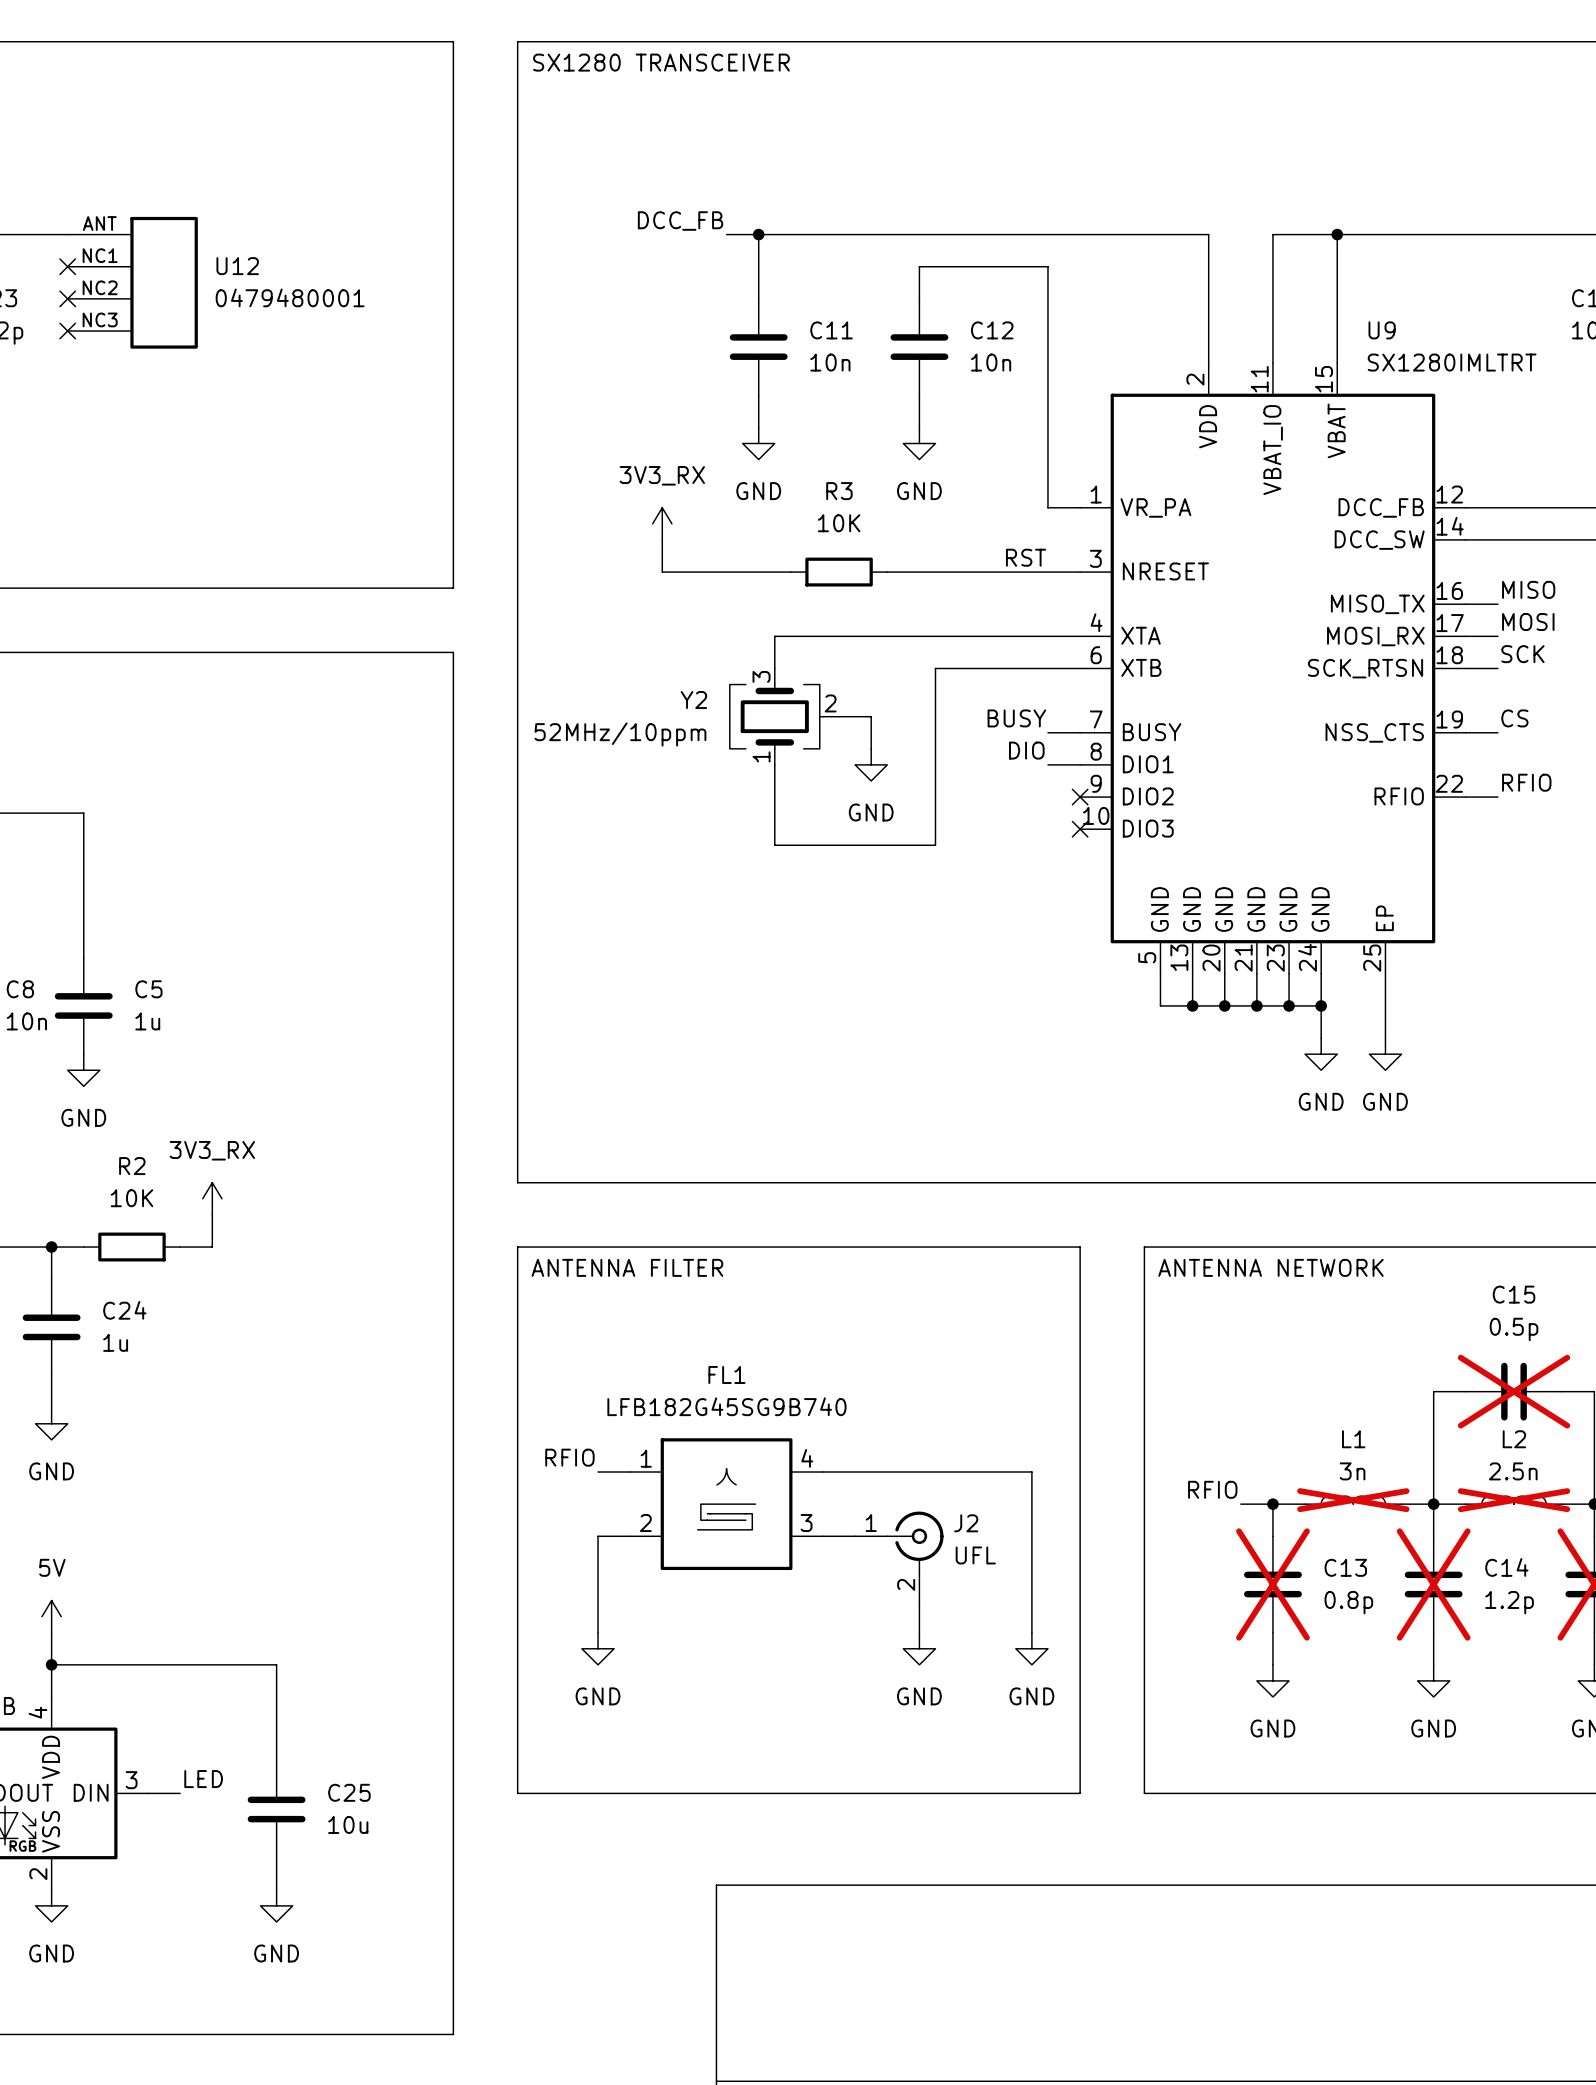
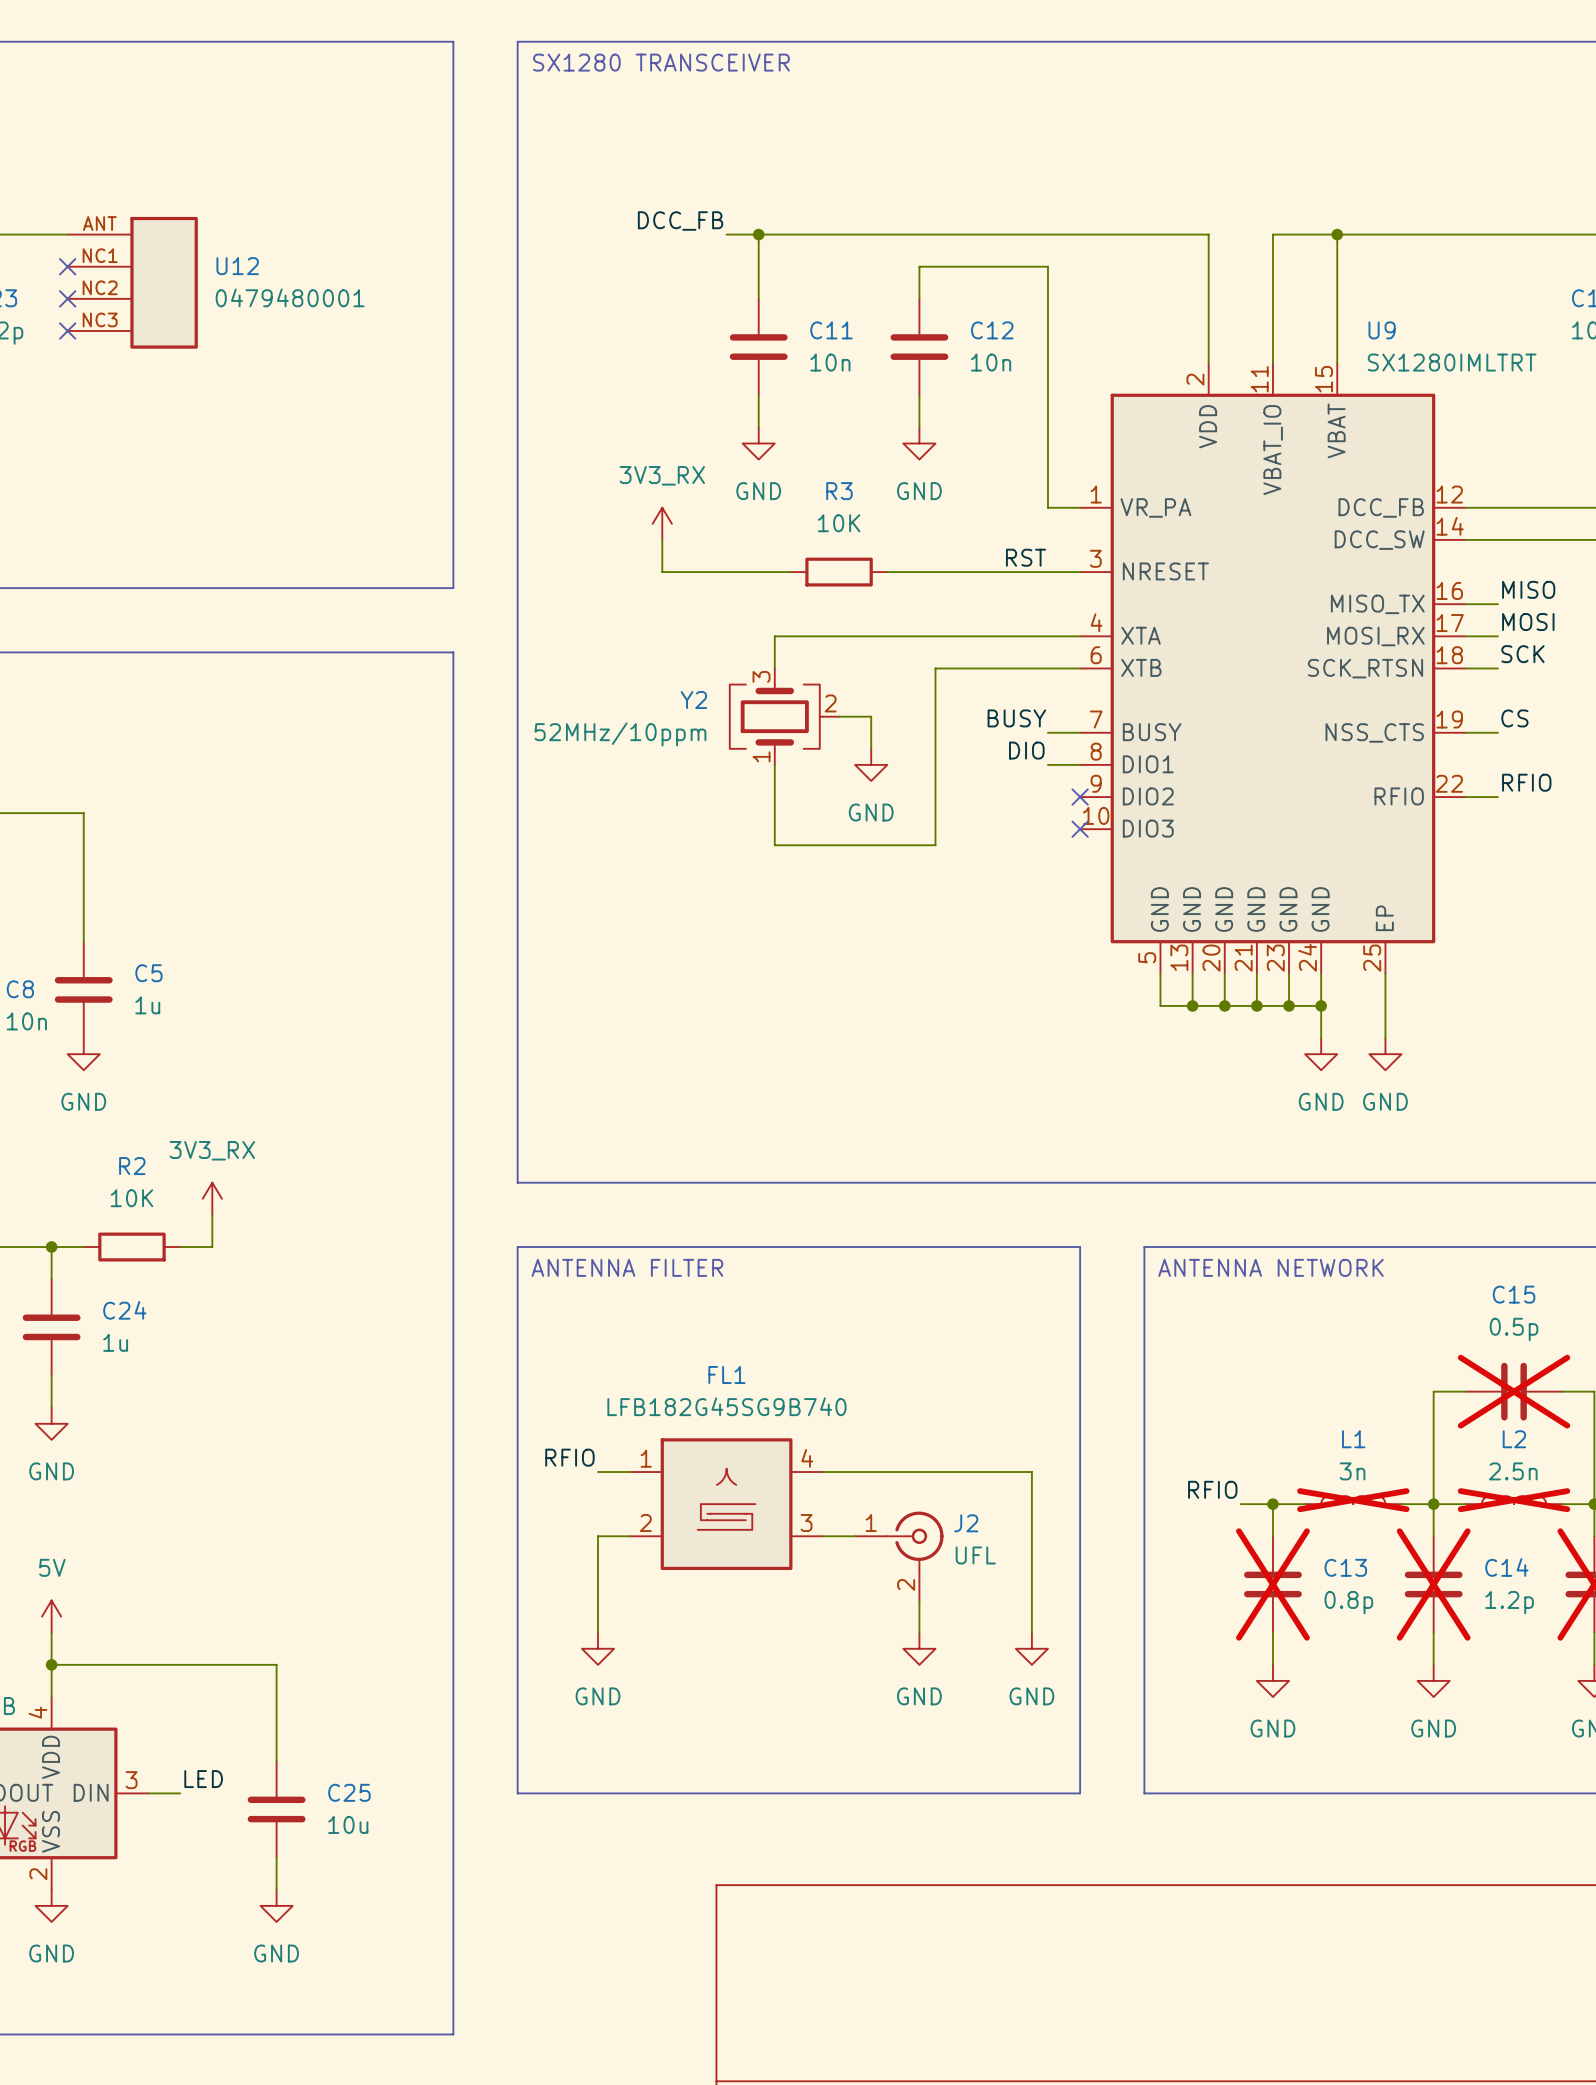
C5 position: (83, 1005) -> (83, 989)
power symbol position: GND (83, 1070) -> GND (83, 1054)

